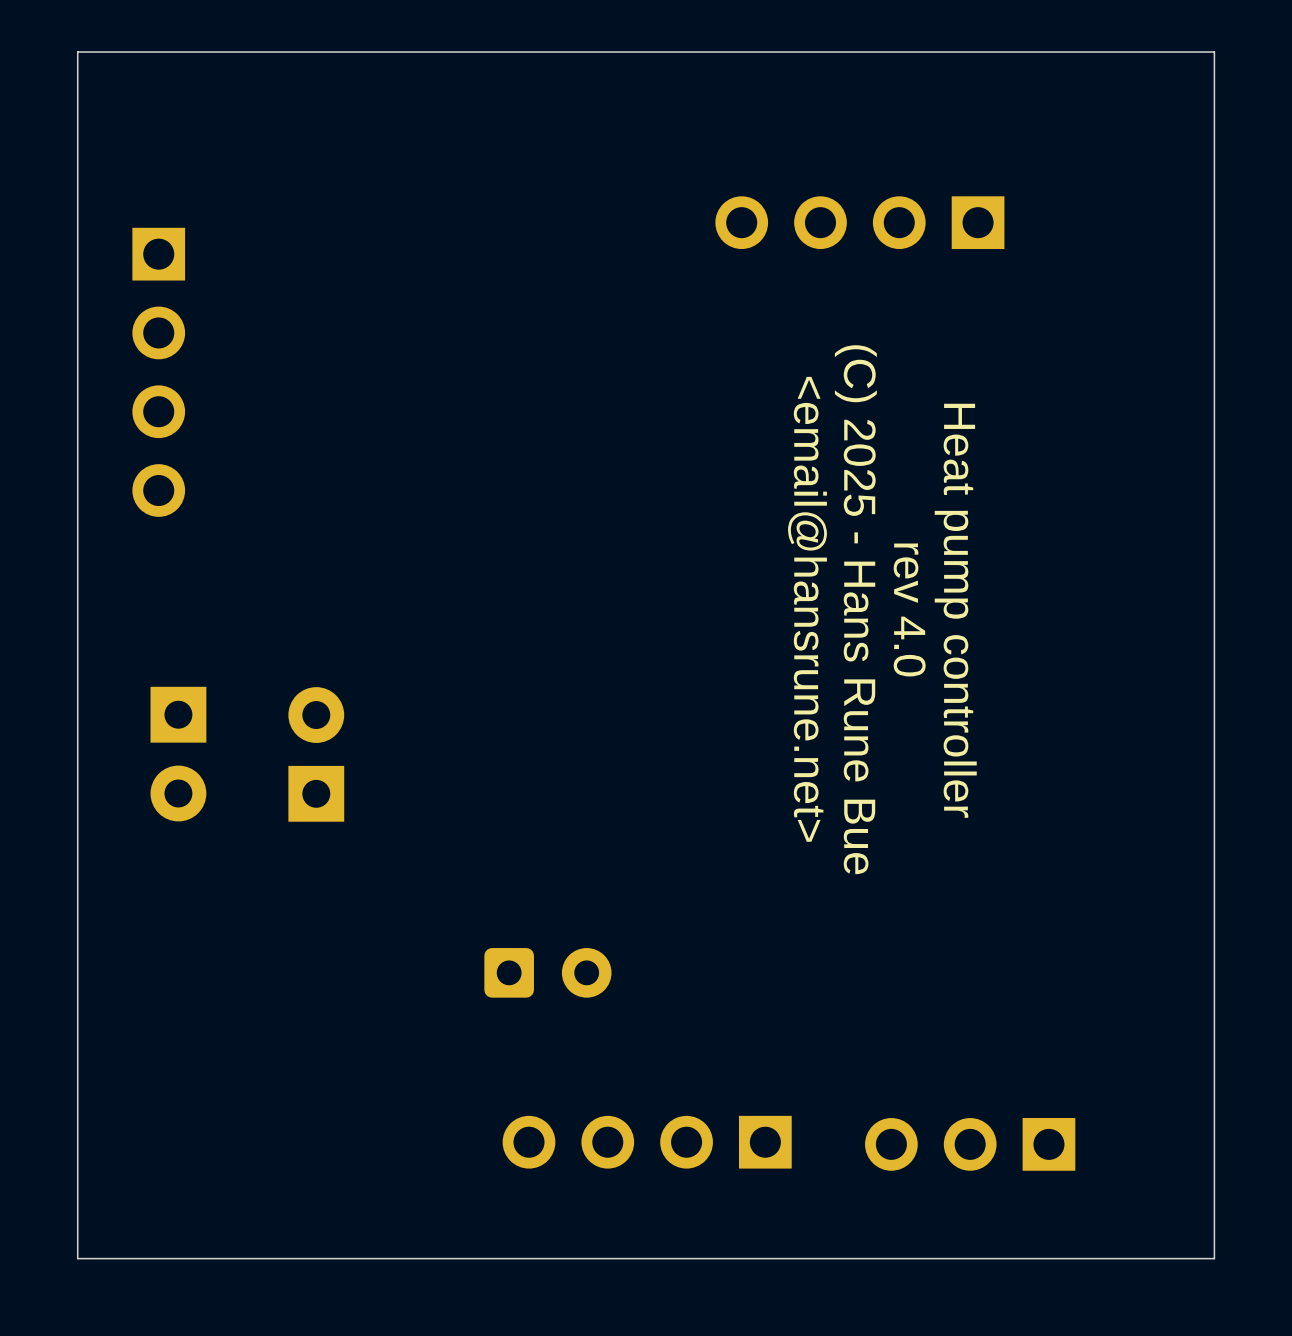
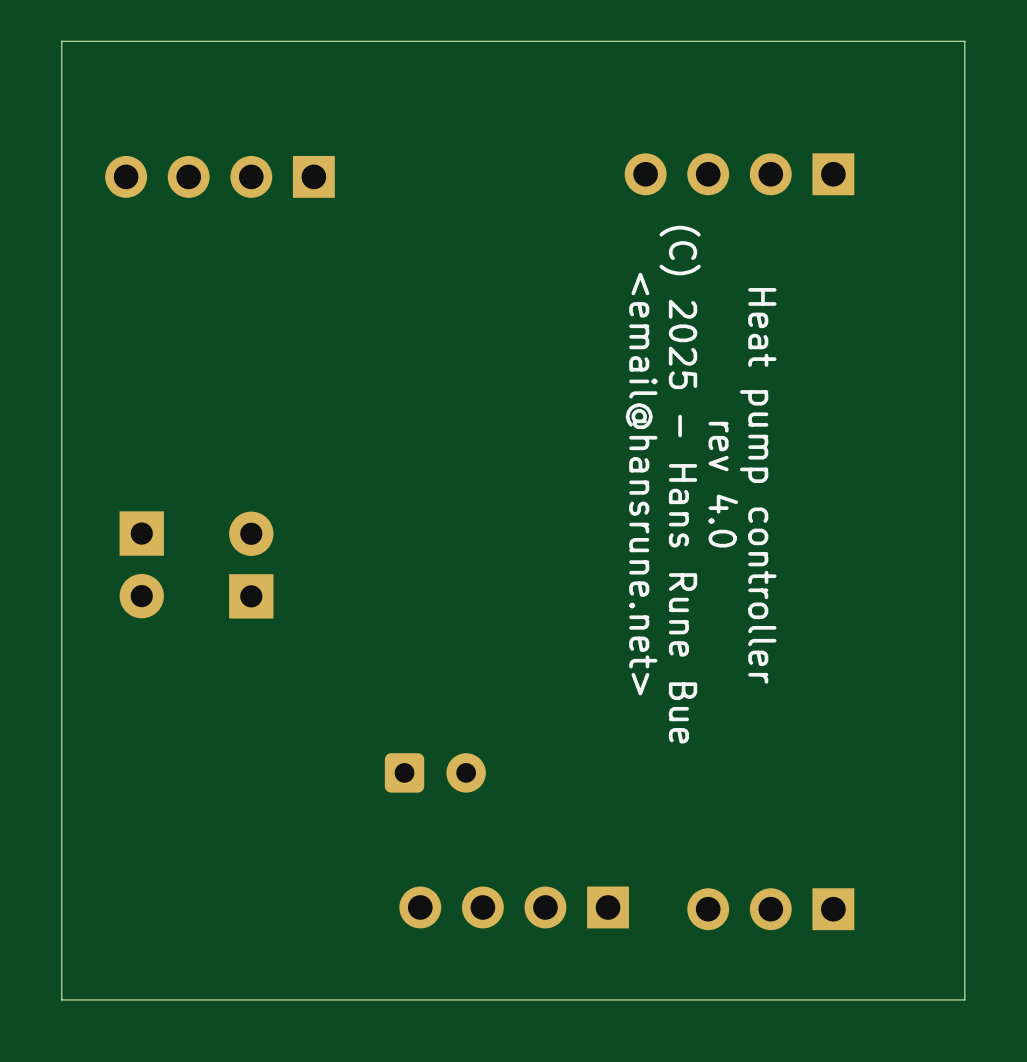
part position: (859, 222) -> (739, 174)
part rotation: 0° (158, 372) -> 90° clockwise (220, 176)
part position: (158, 372) -> (220, 176)
part position: (178, 754) -> (141, 564)
part position: (316, 754) -> (251, 565)

